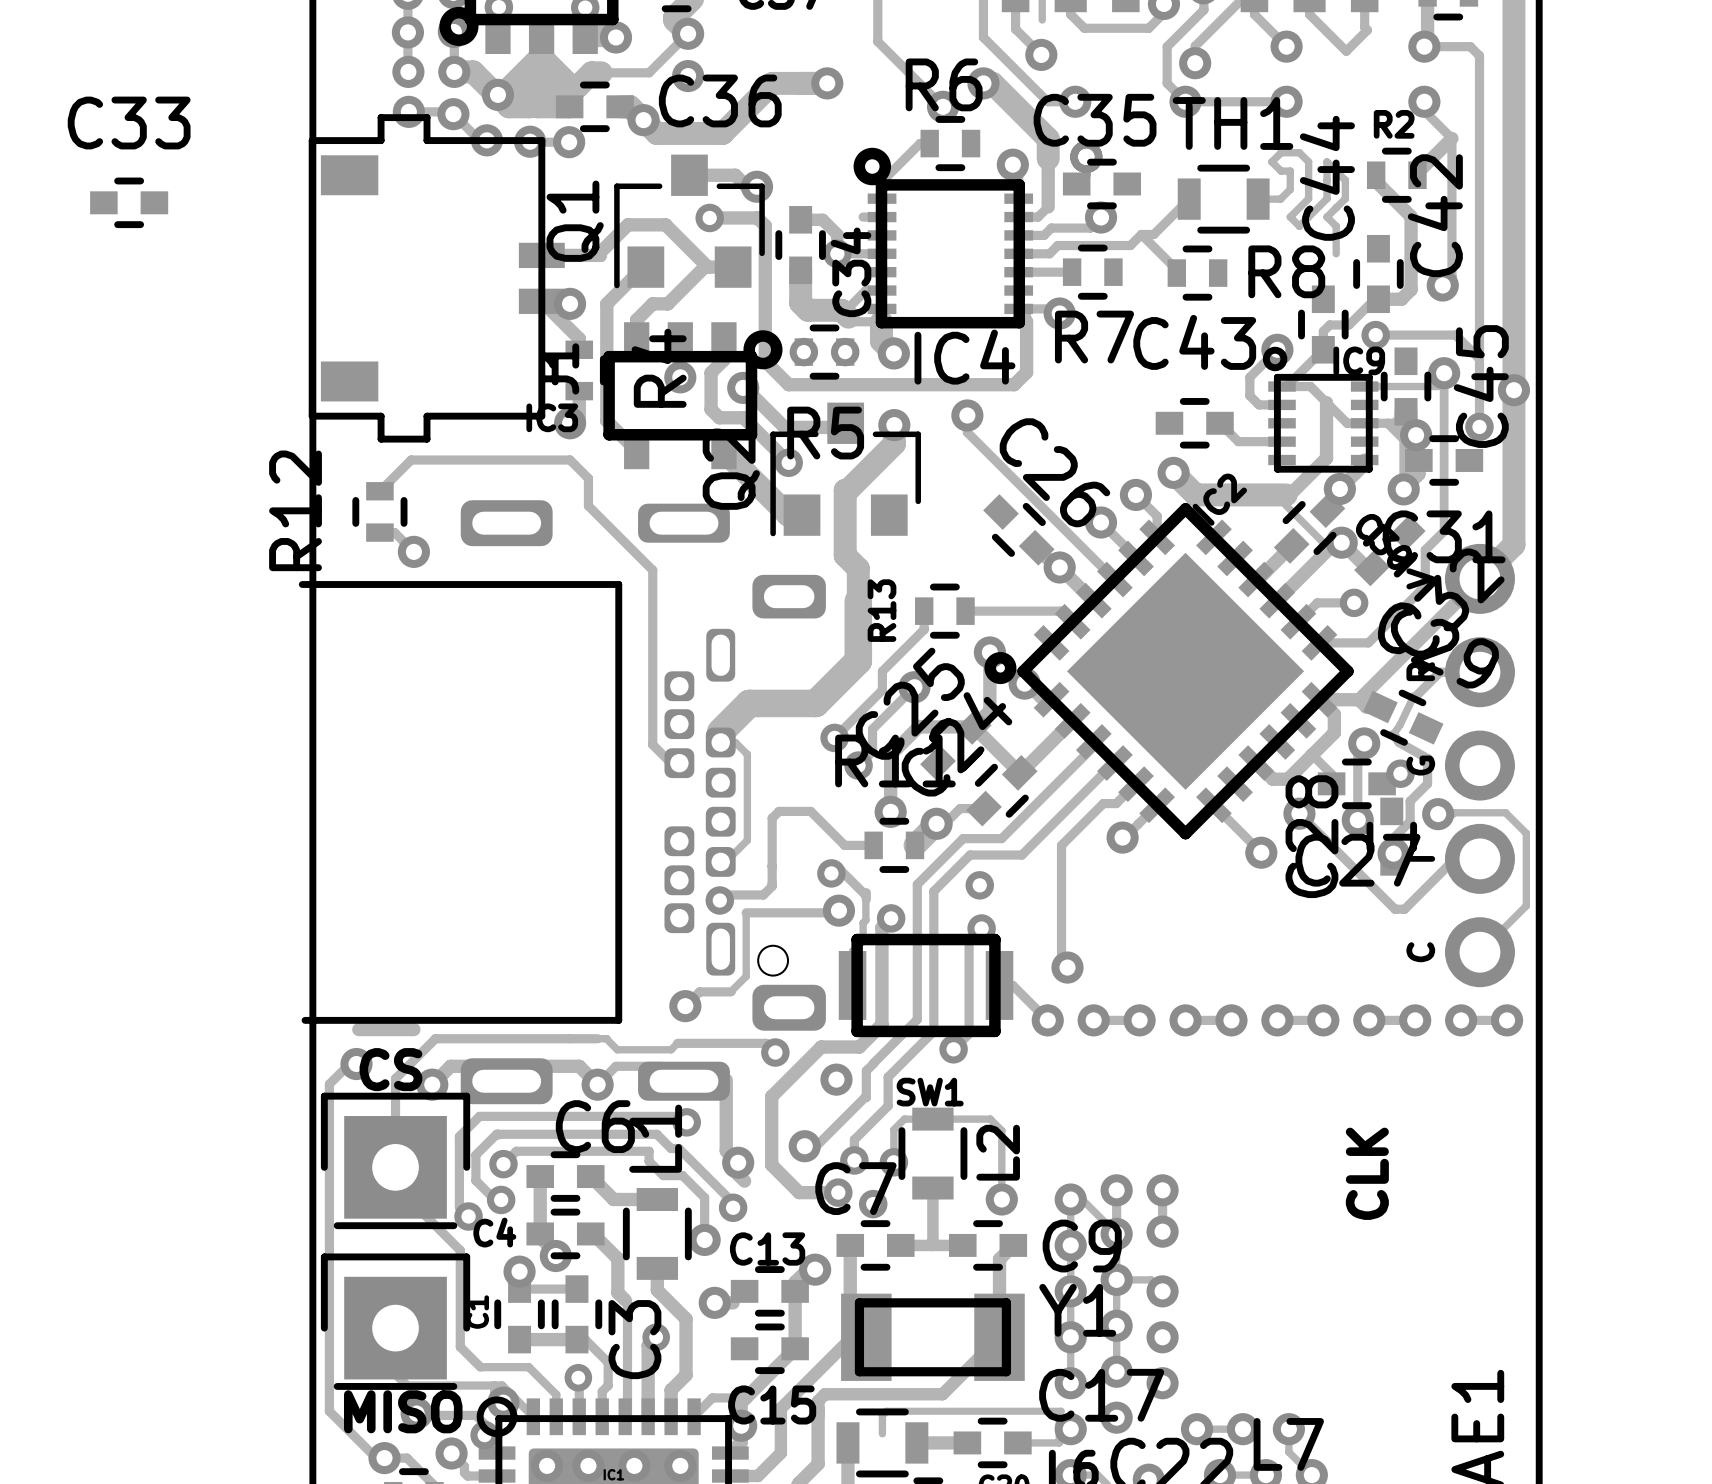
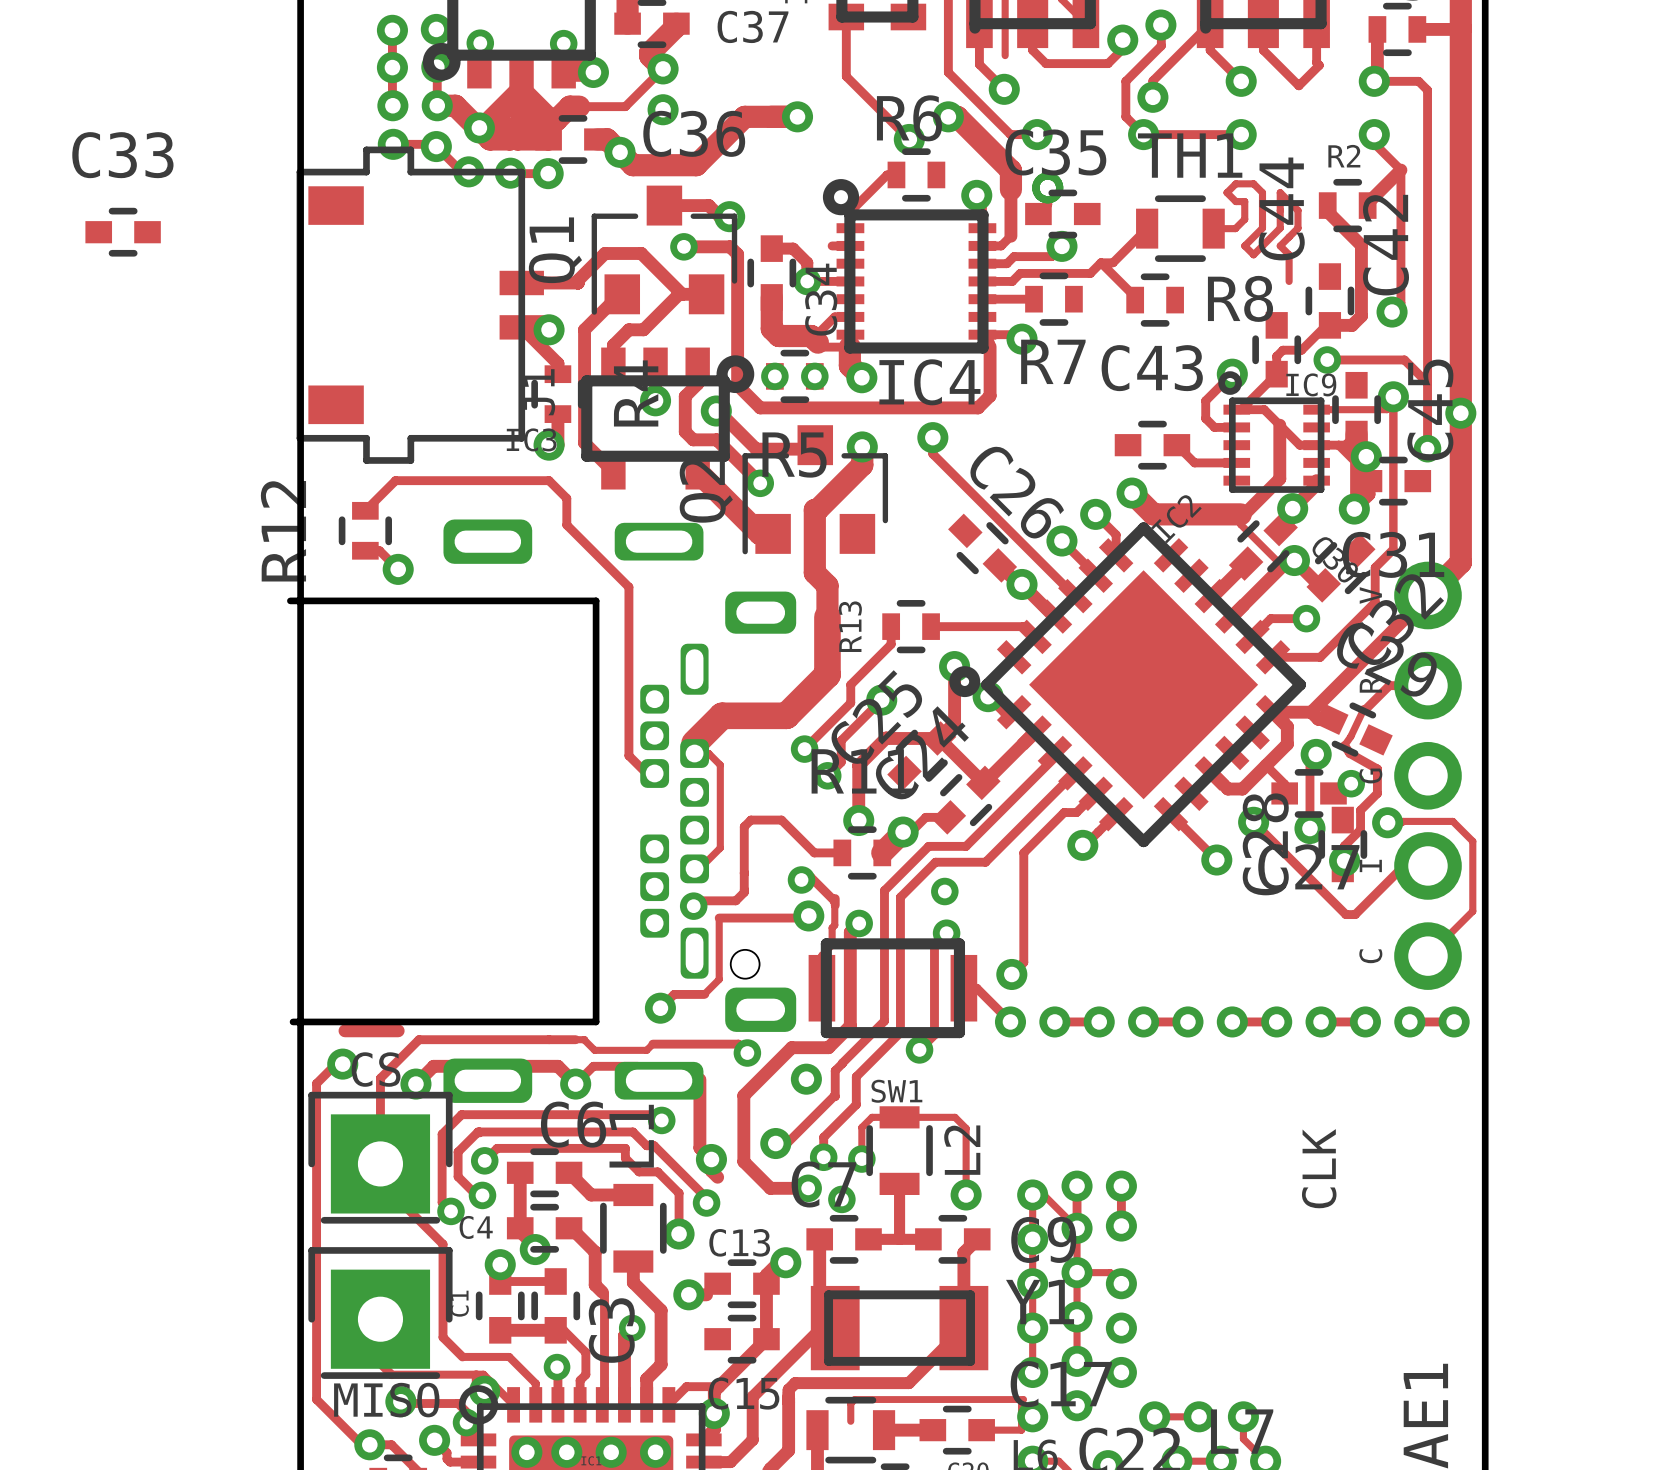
via position: (1067, 967) -> (1011, 974)

